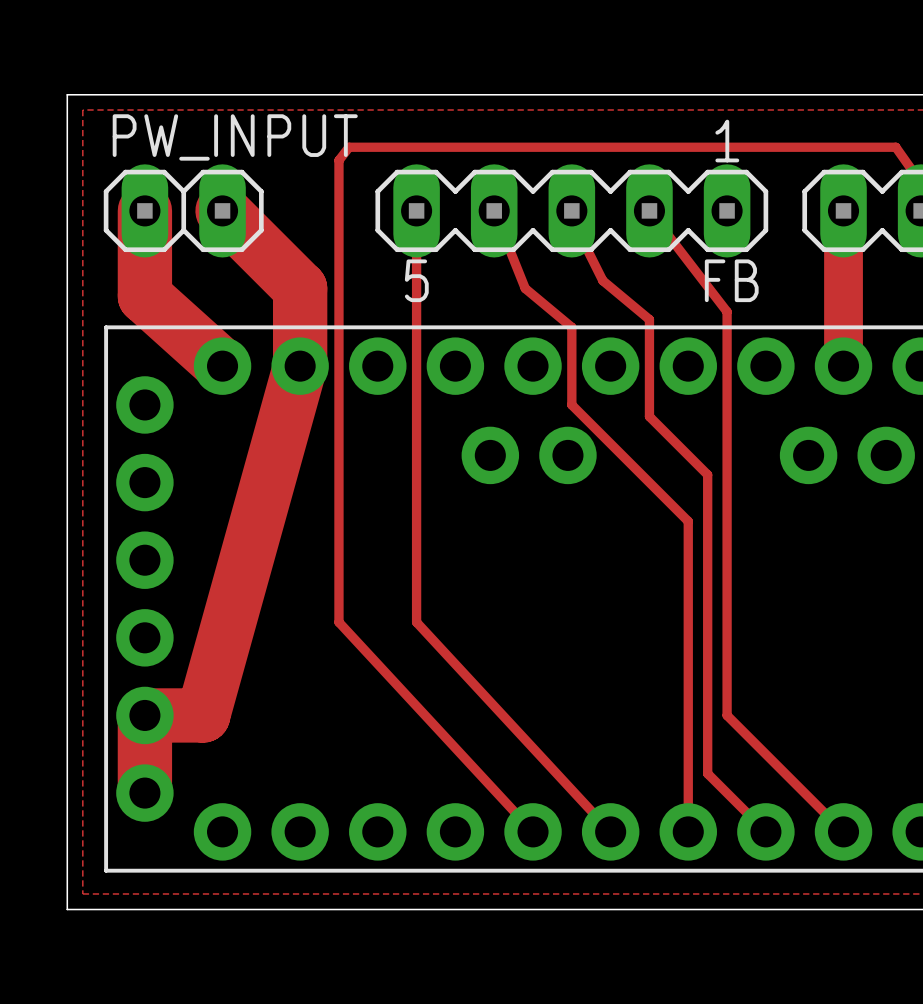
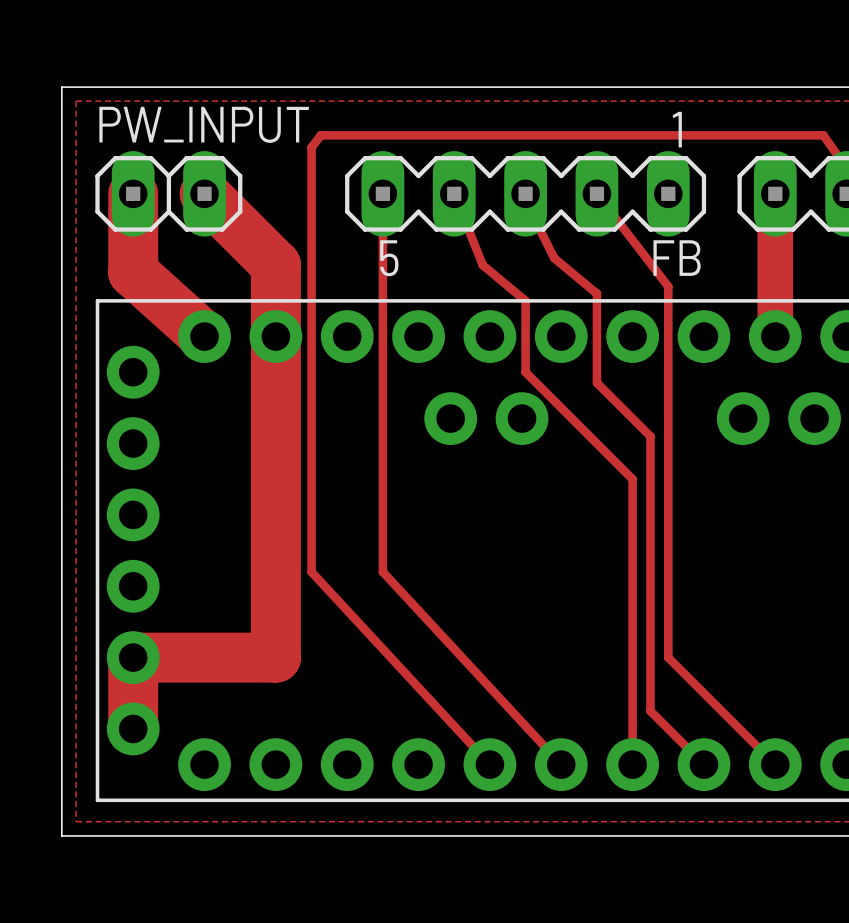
track: (300, 366) (203, 715) -> (275, 336) (275, 657) (186, 657)

